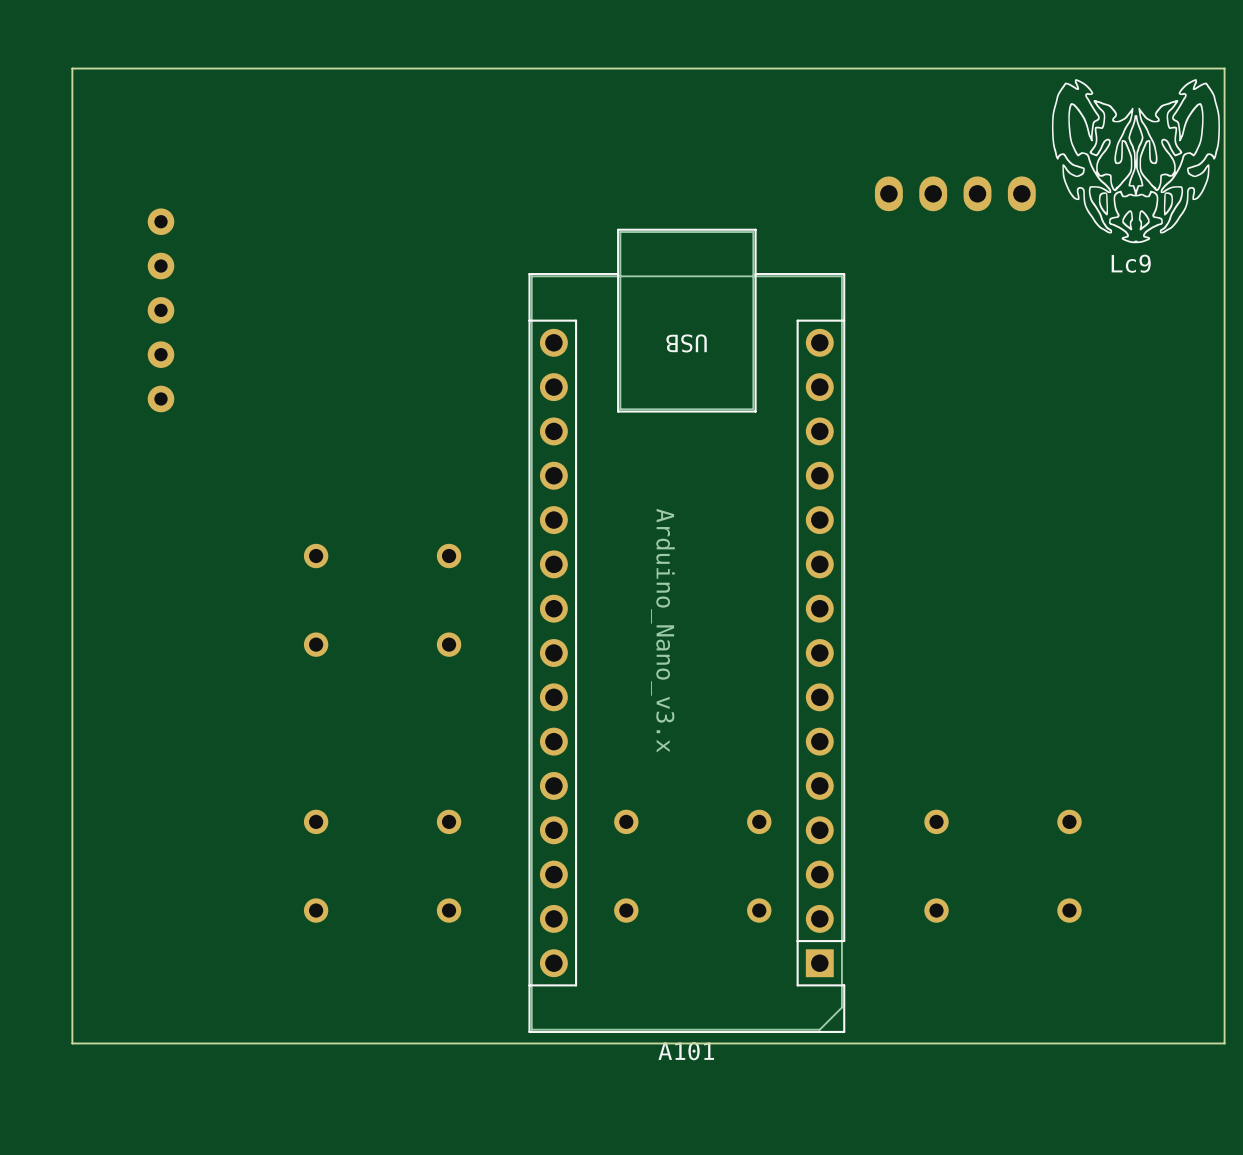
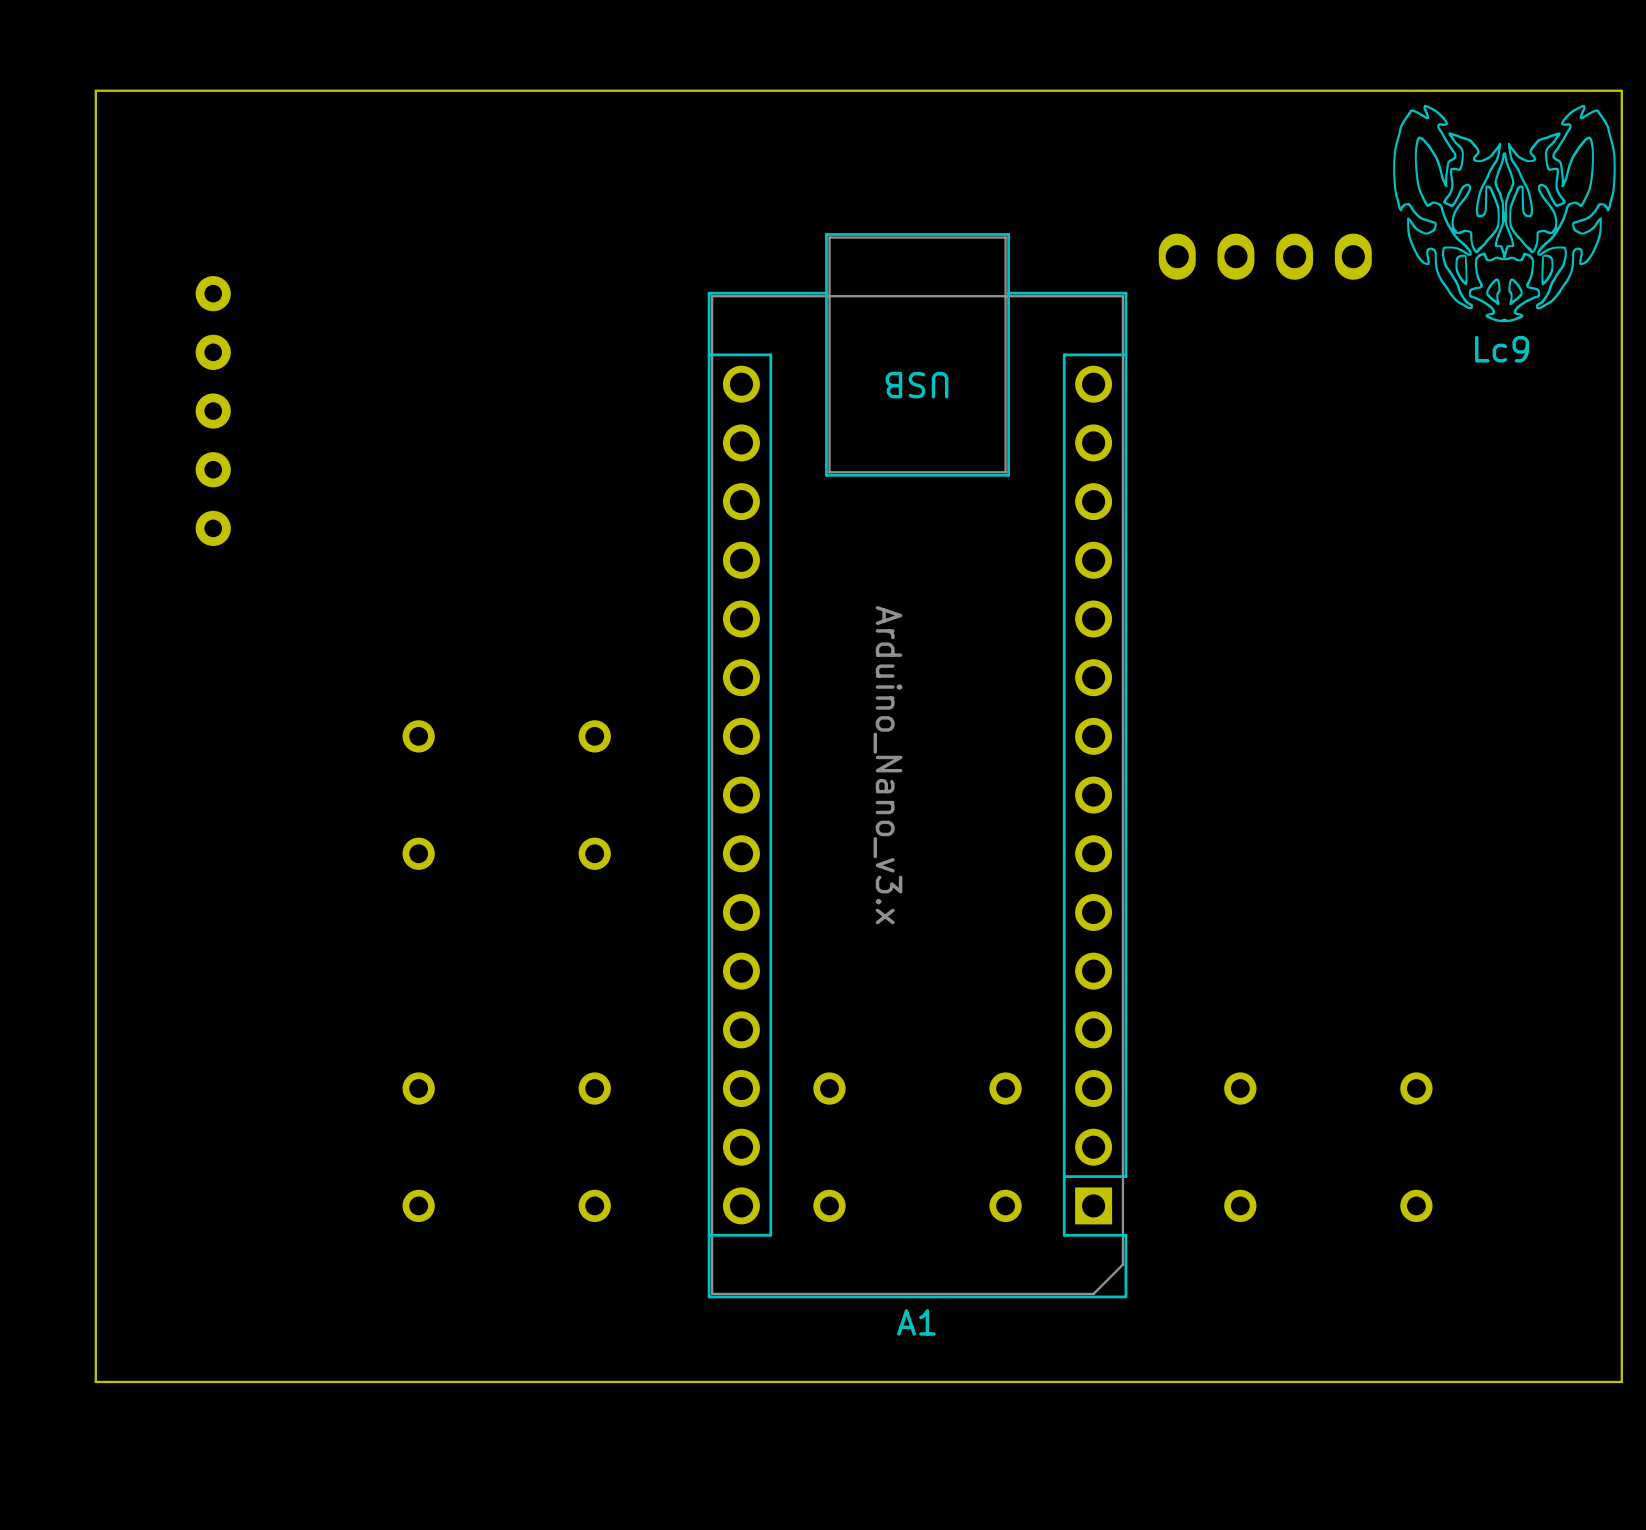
A1: none -> Arduino_Nano_v3.x (917, 765)
A101: Arduino_Nano_v3.x (686, 630) -> none

